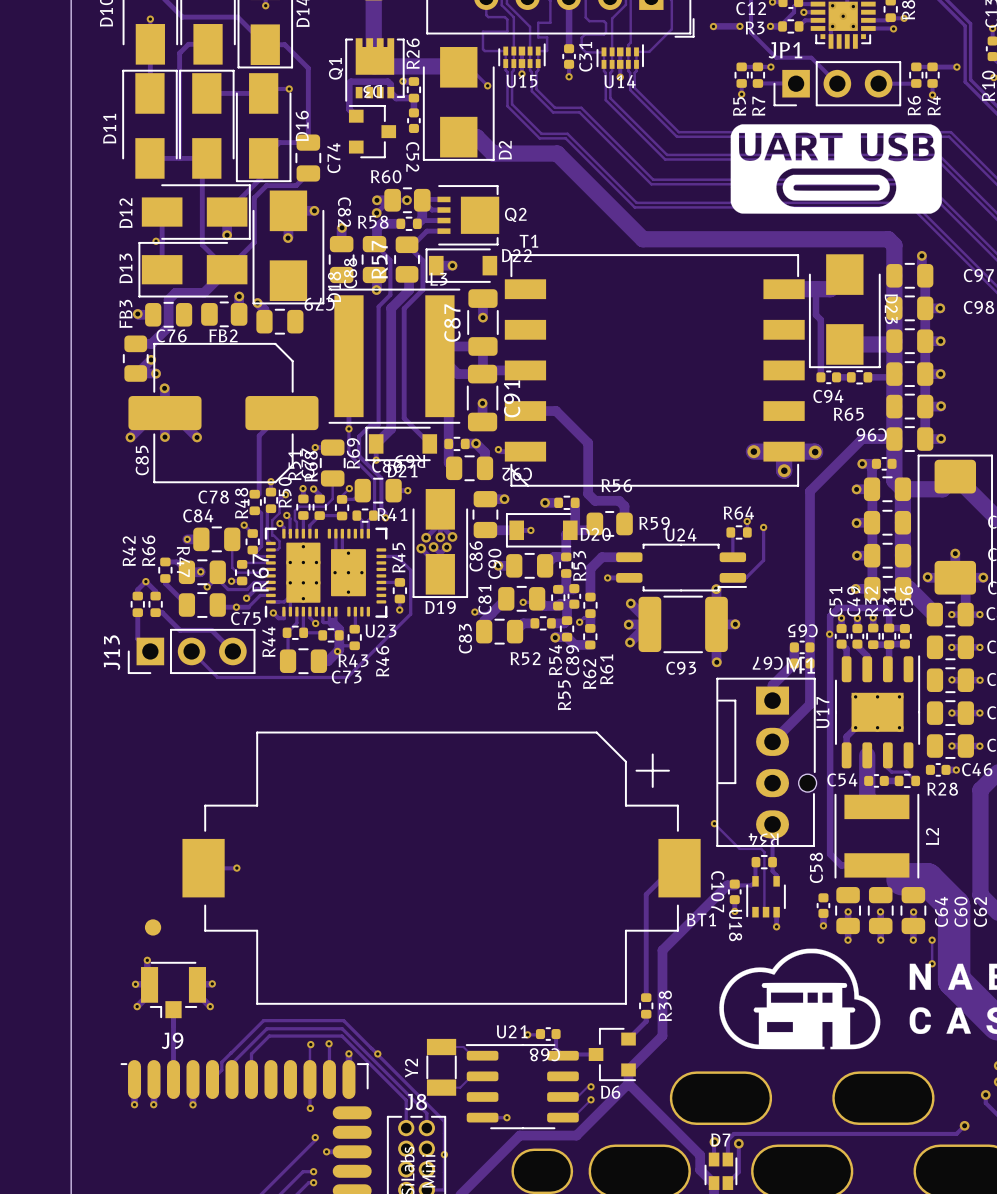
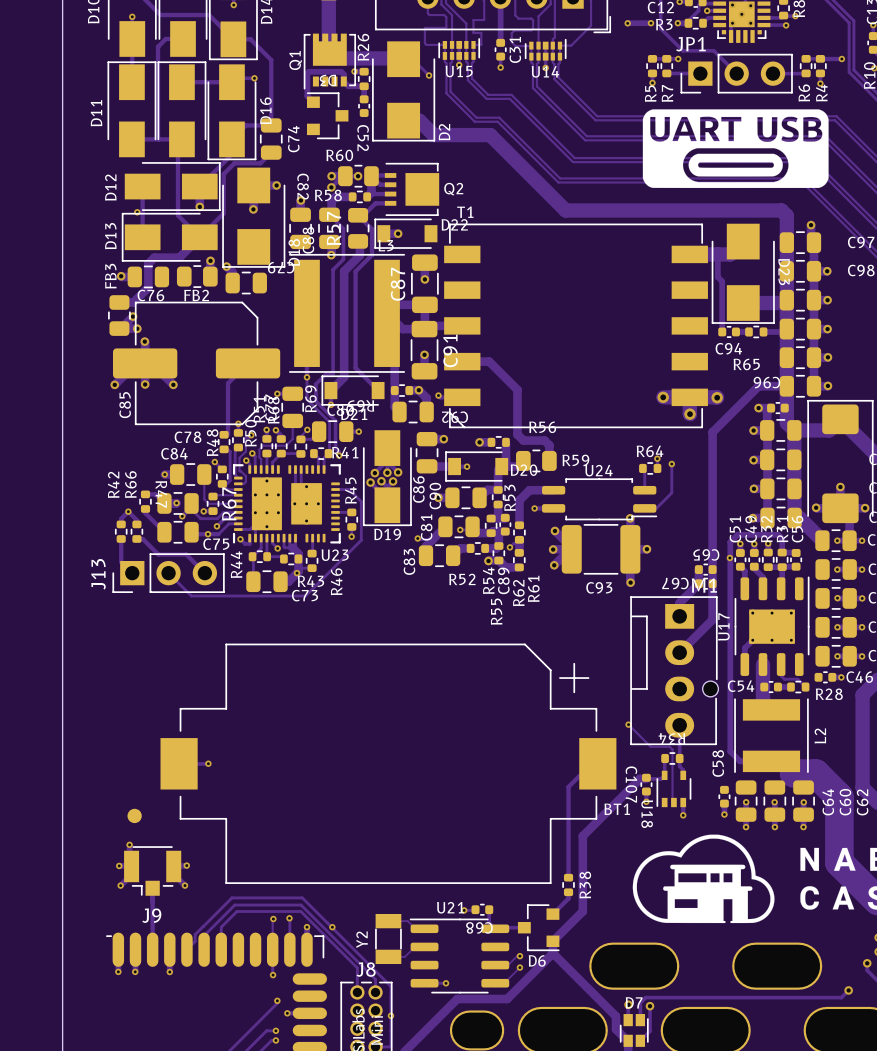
track: (932, 940) (932, 963) -> none
via: (932, 940) -> none
via: (932, 963) -> none

